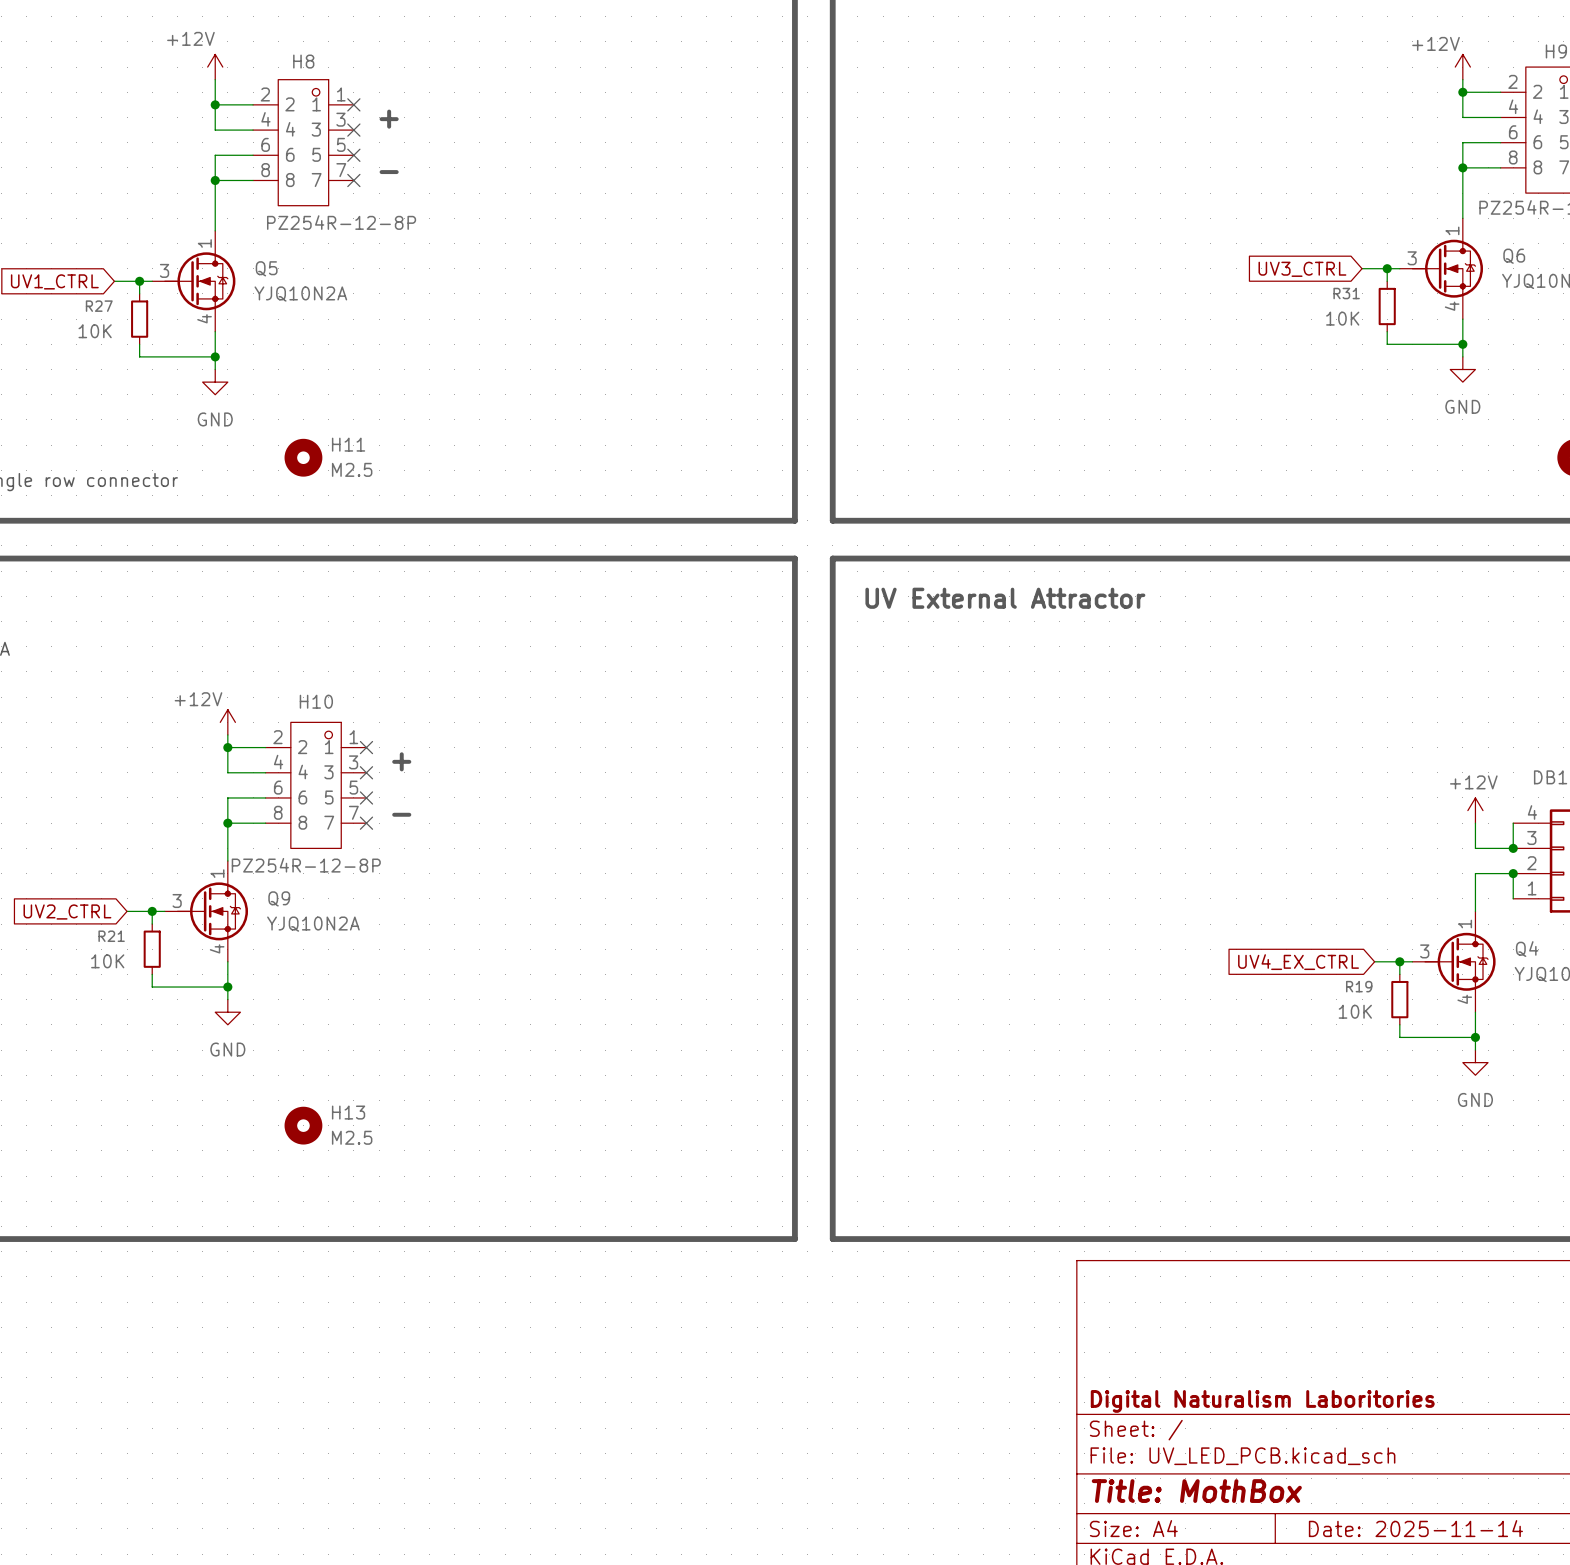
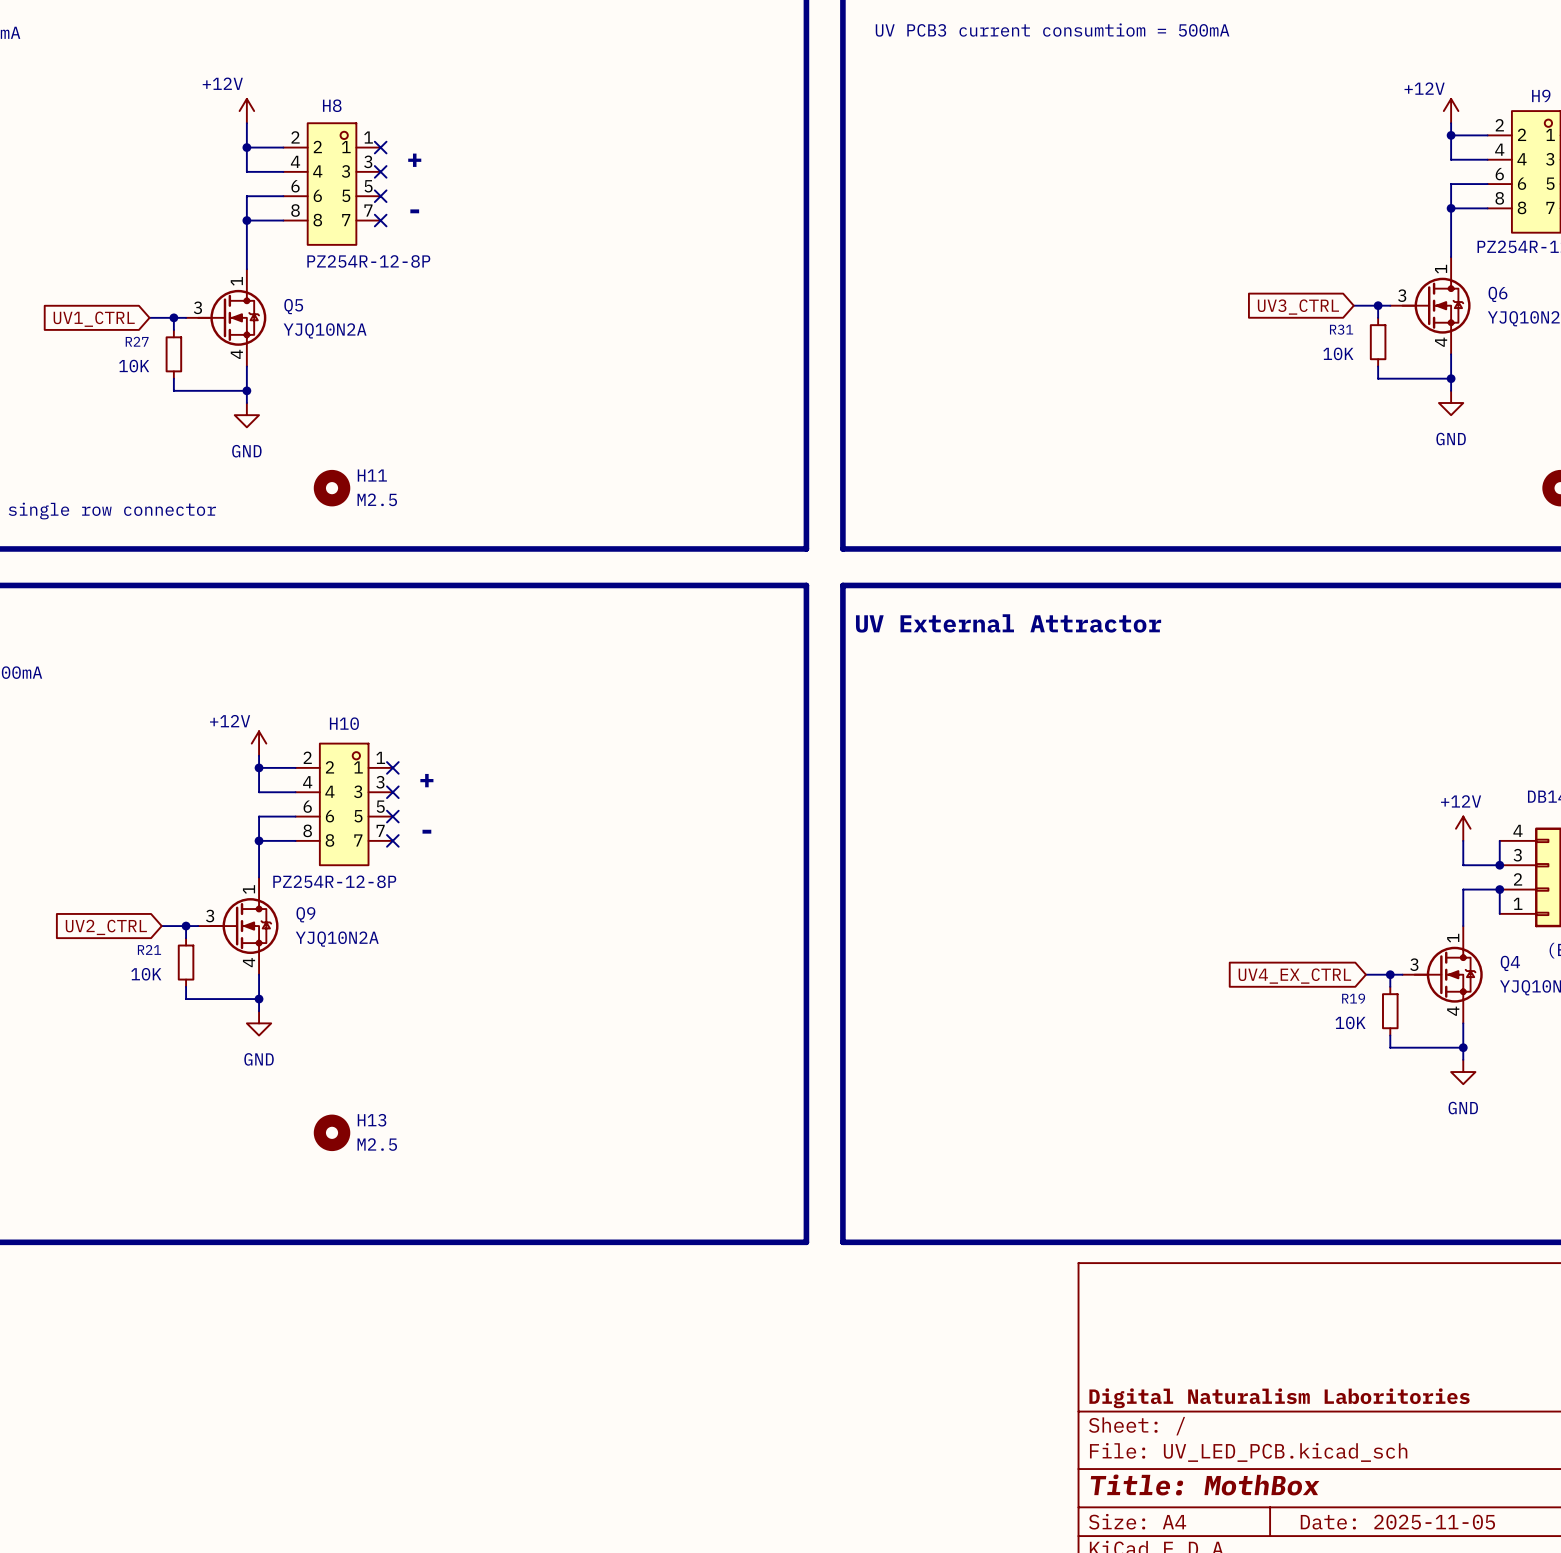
title block: Date: 2025-11-14 (1415, 1528) -> Date: 2025-11-05 (1397, 1522)

